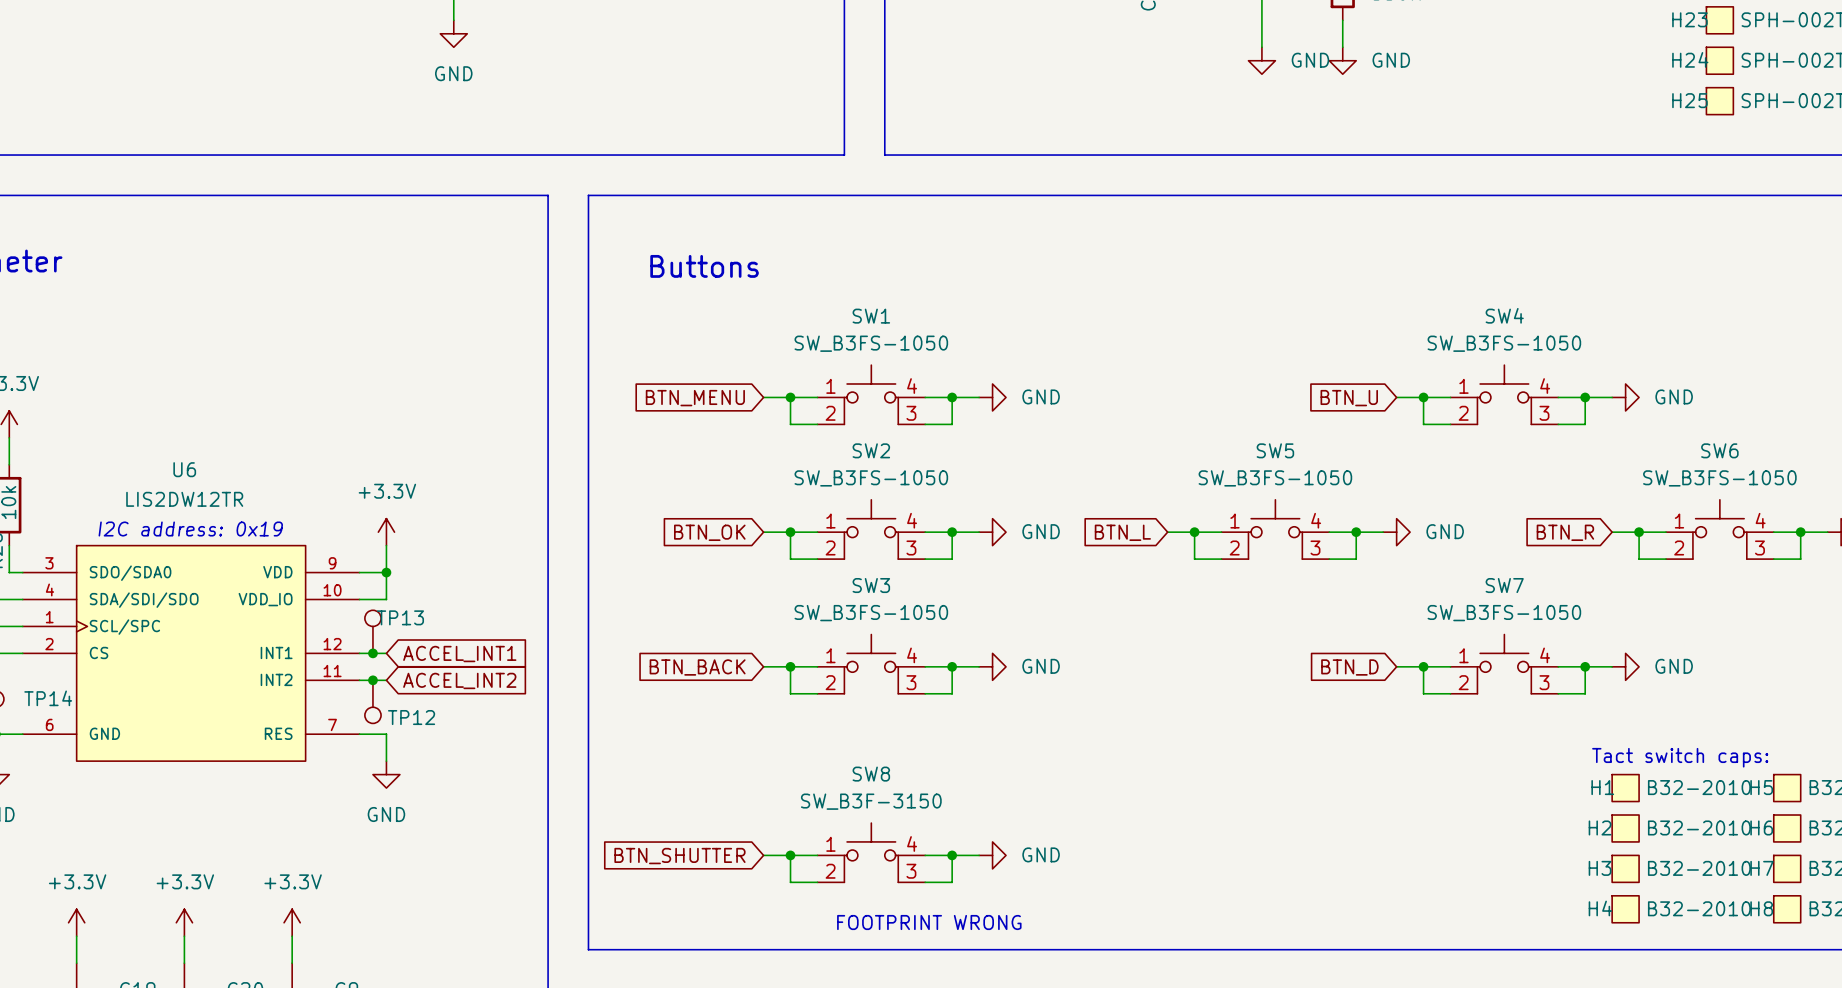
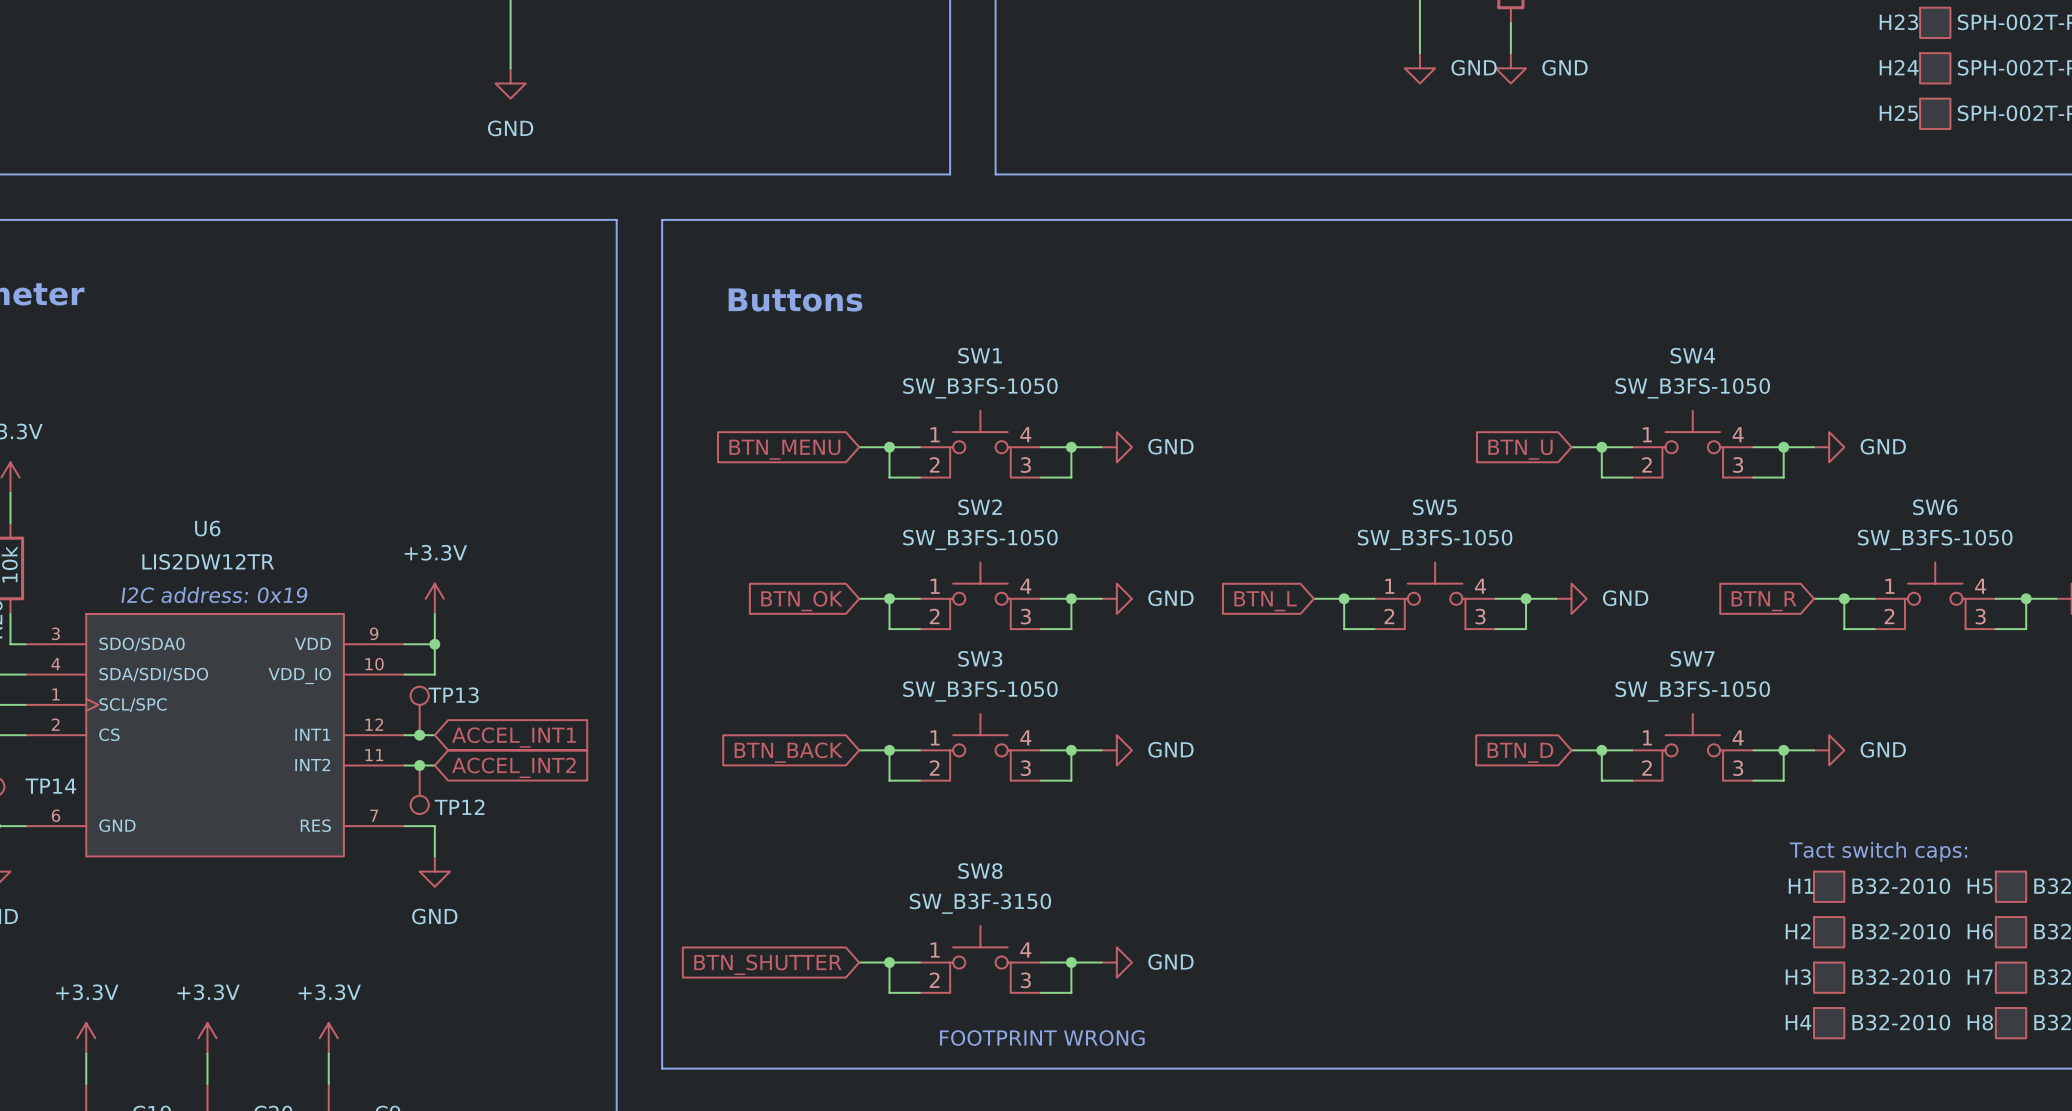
wire: none -> (510, 22) (510, 68)
power symbol position: GND (453, 33) -> GND (510, 83)

